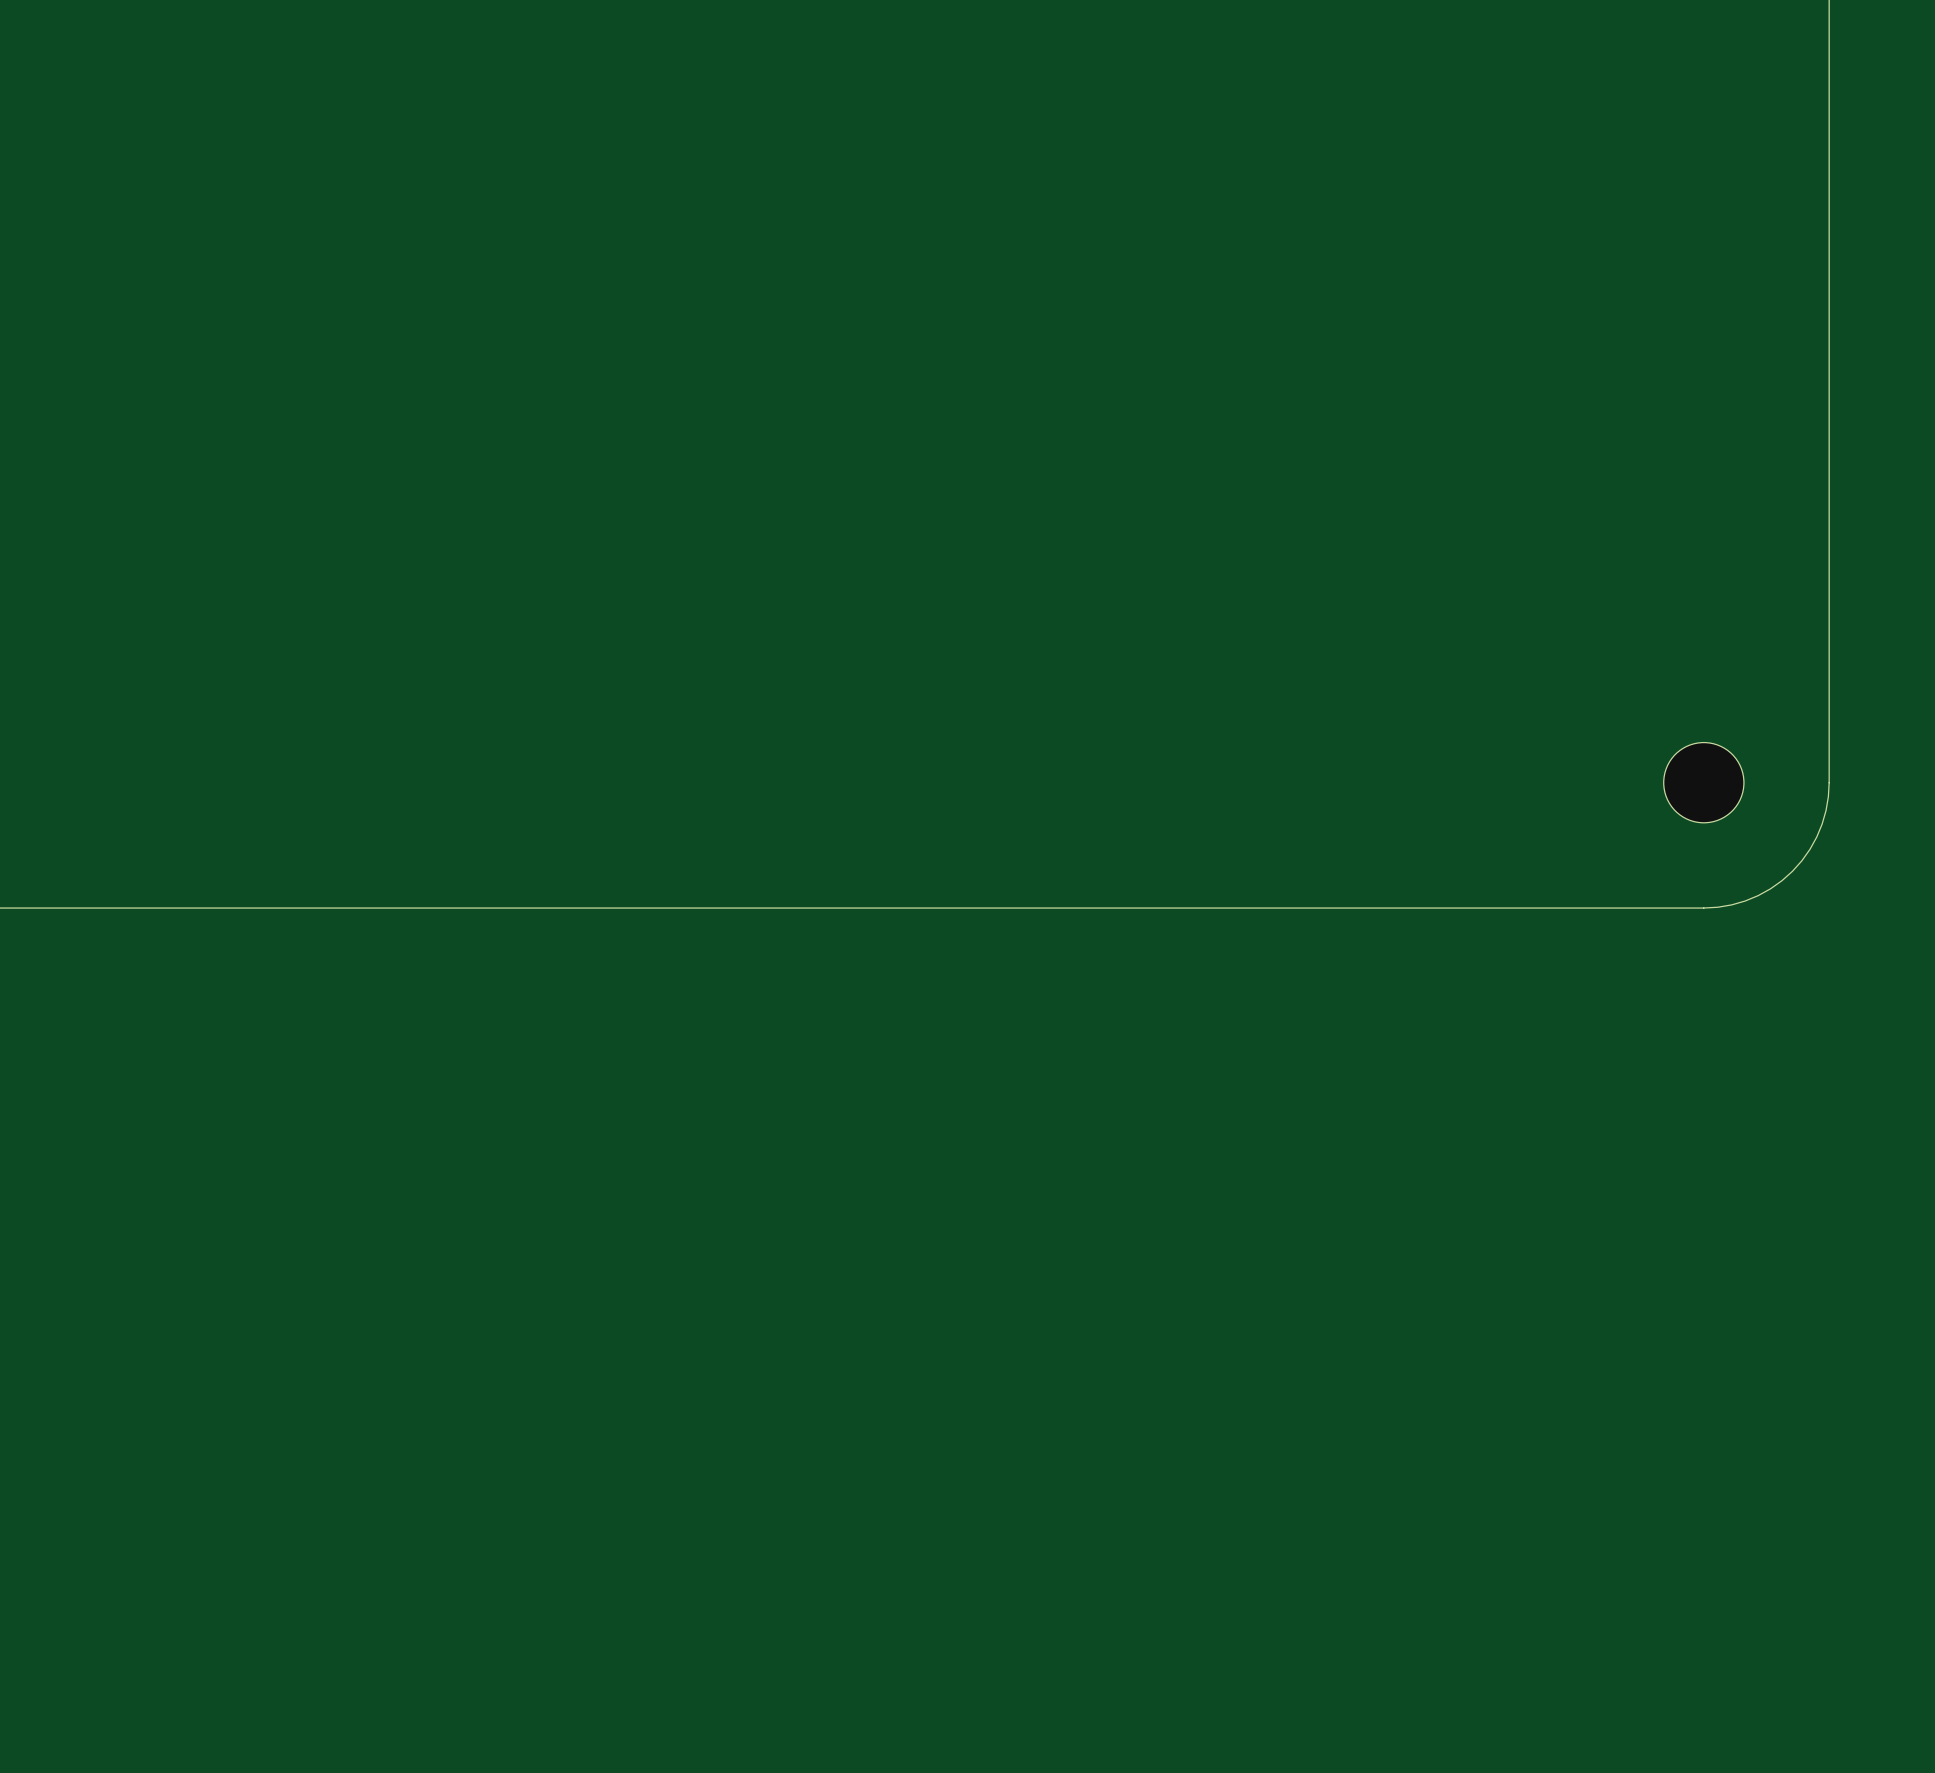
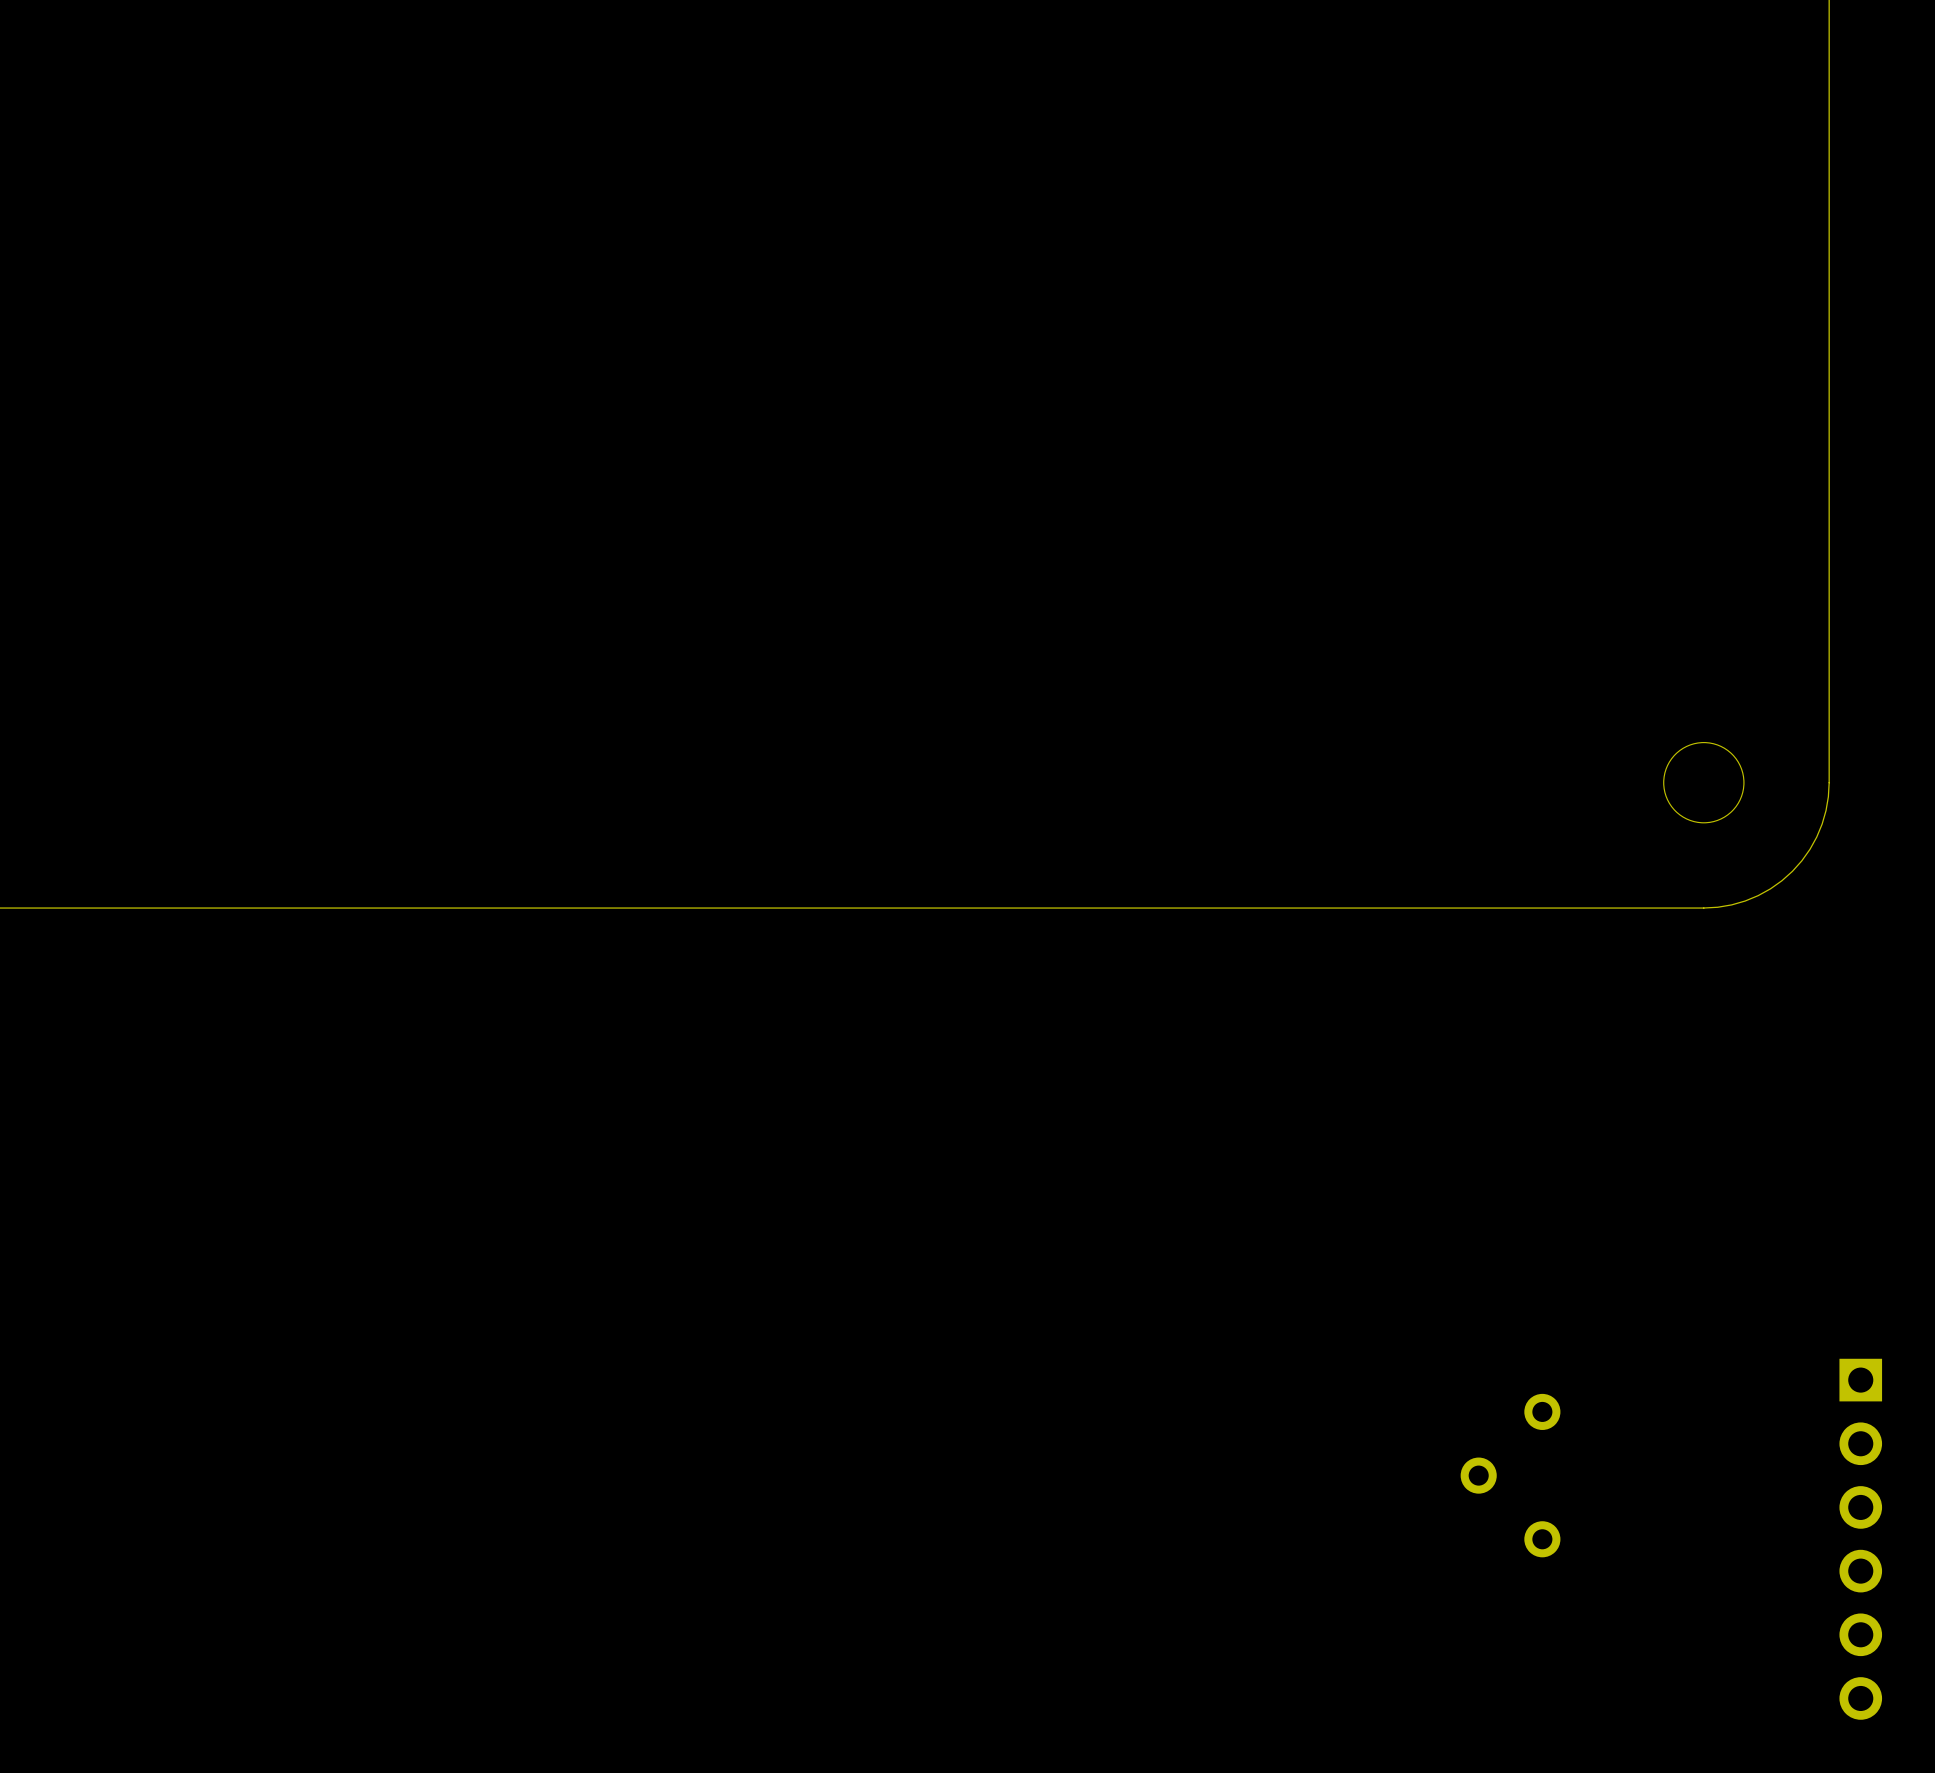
part: none -> (1510, 1475)
part: none -> (1860, 1539)

